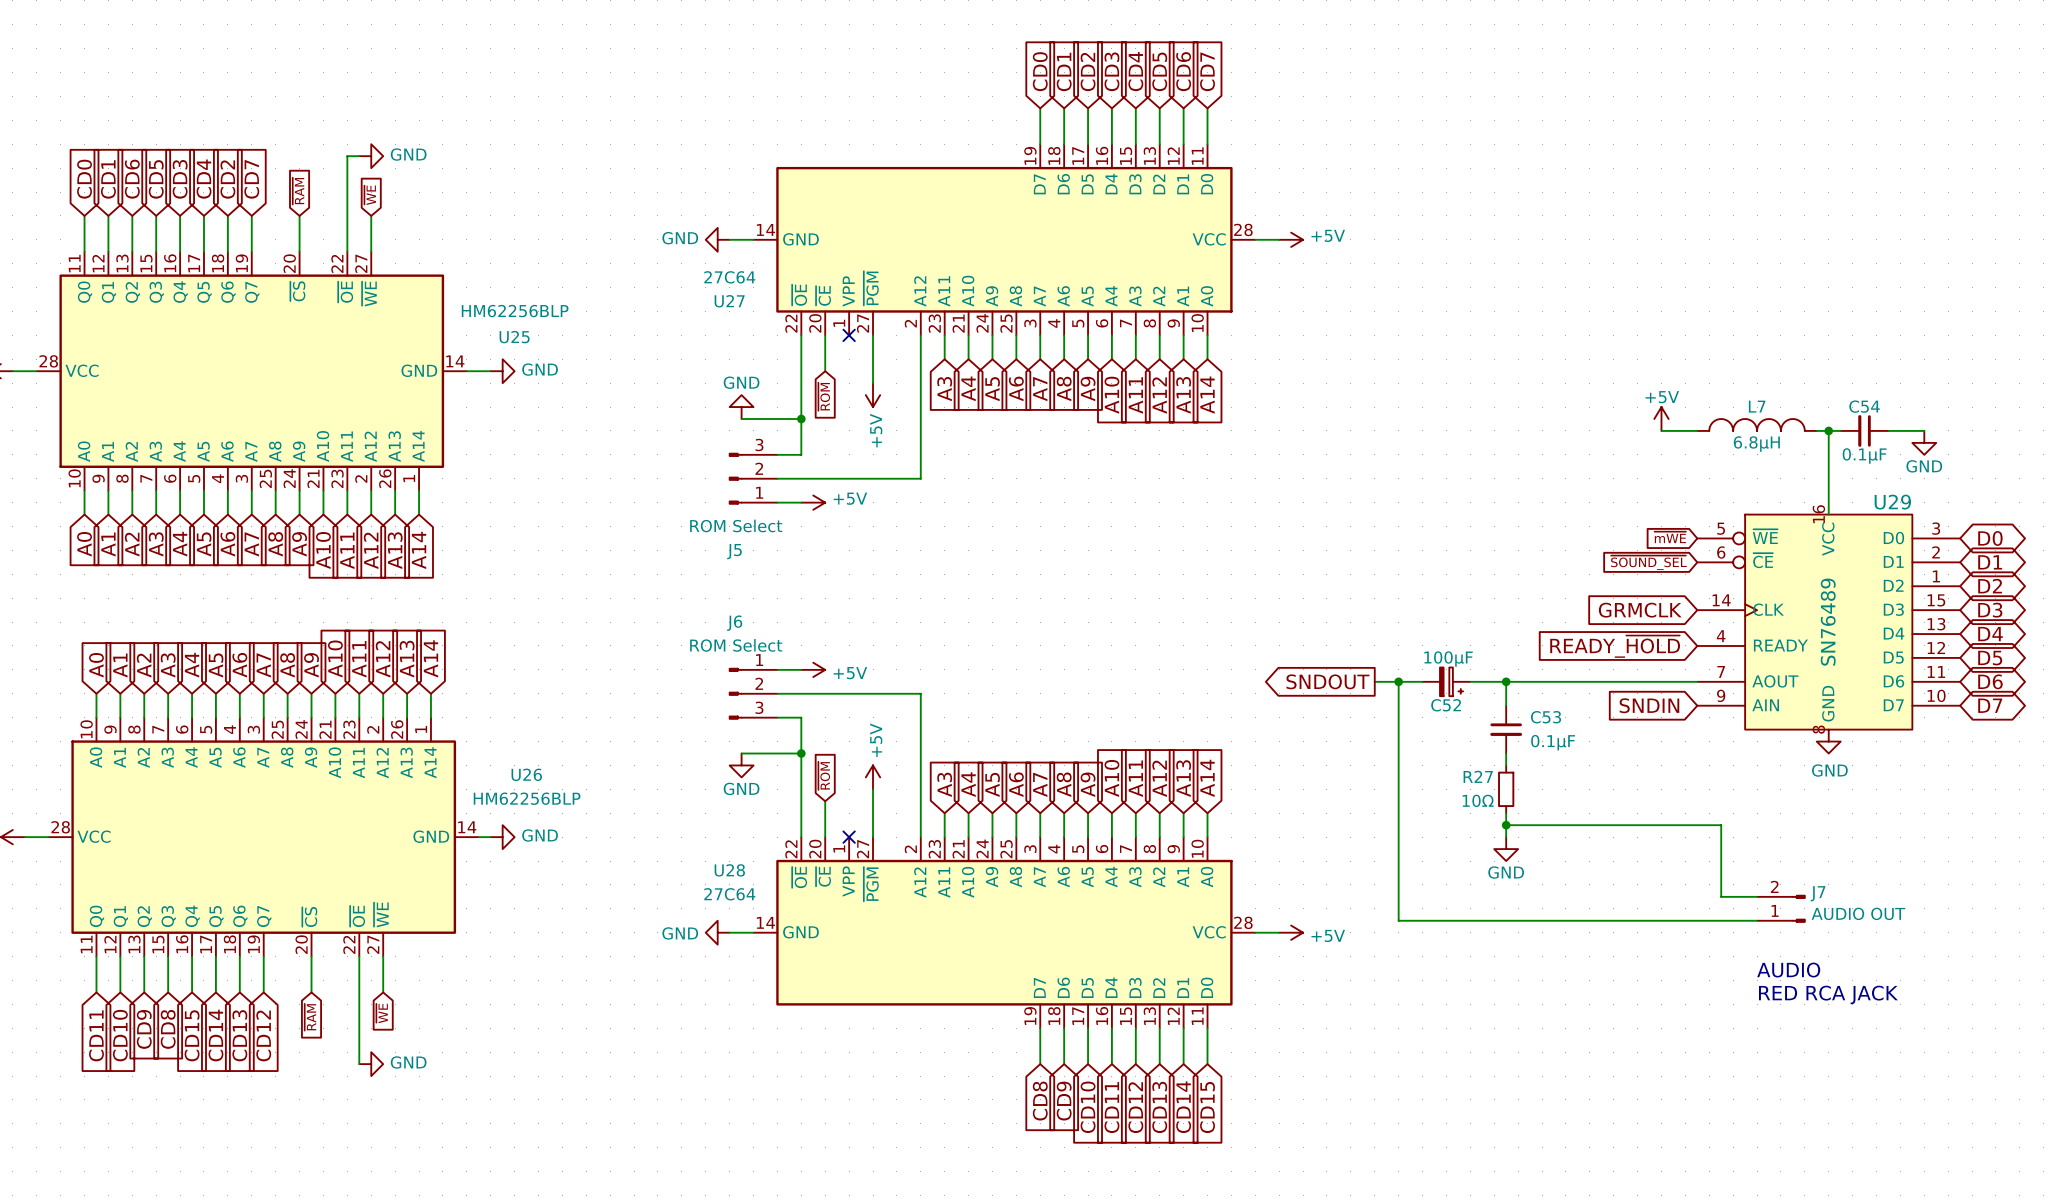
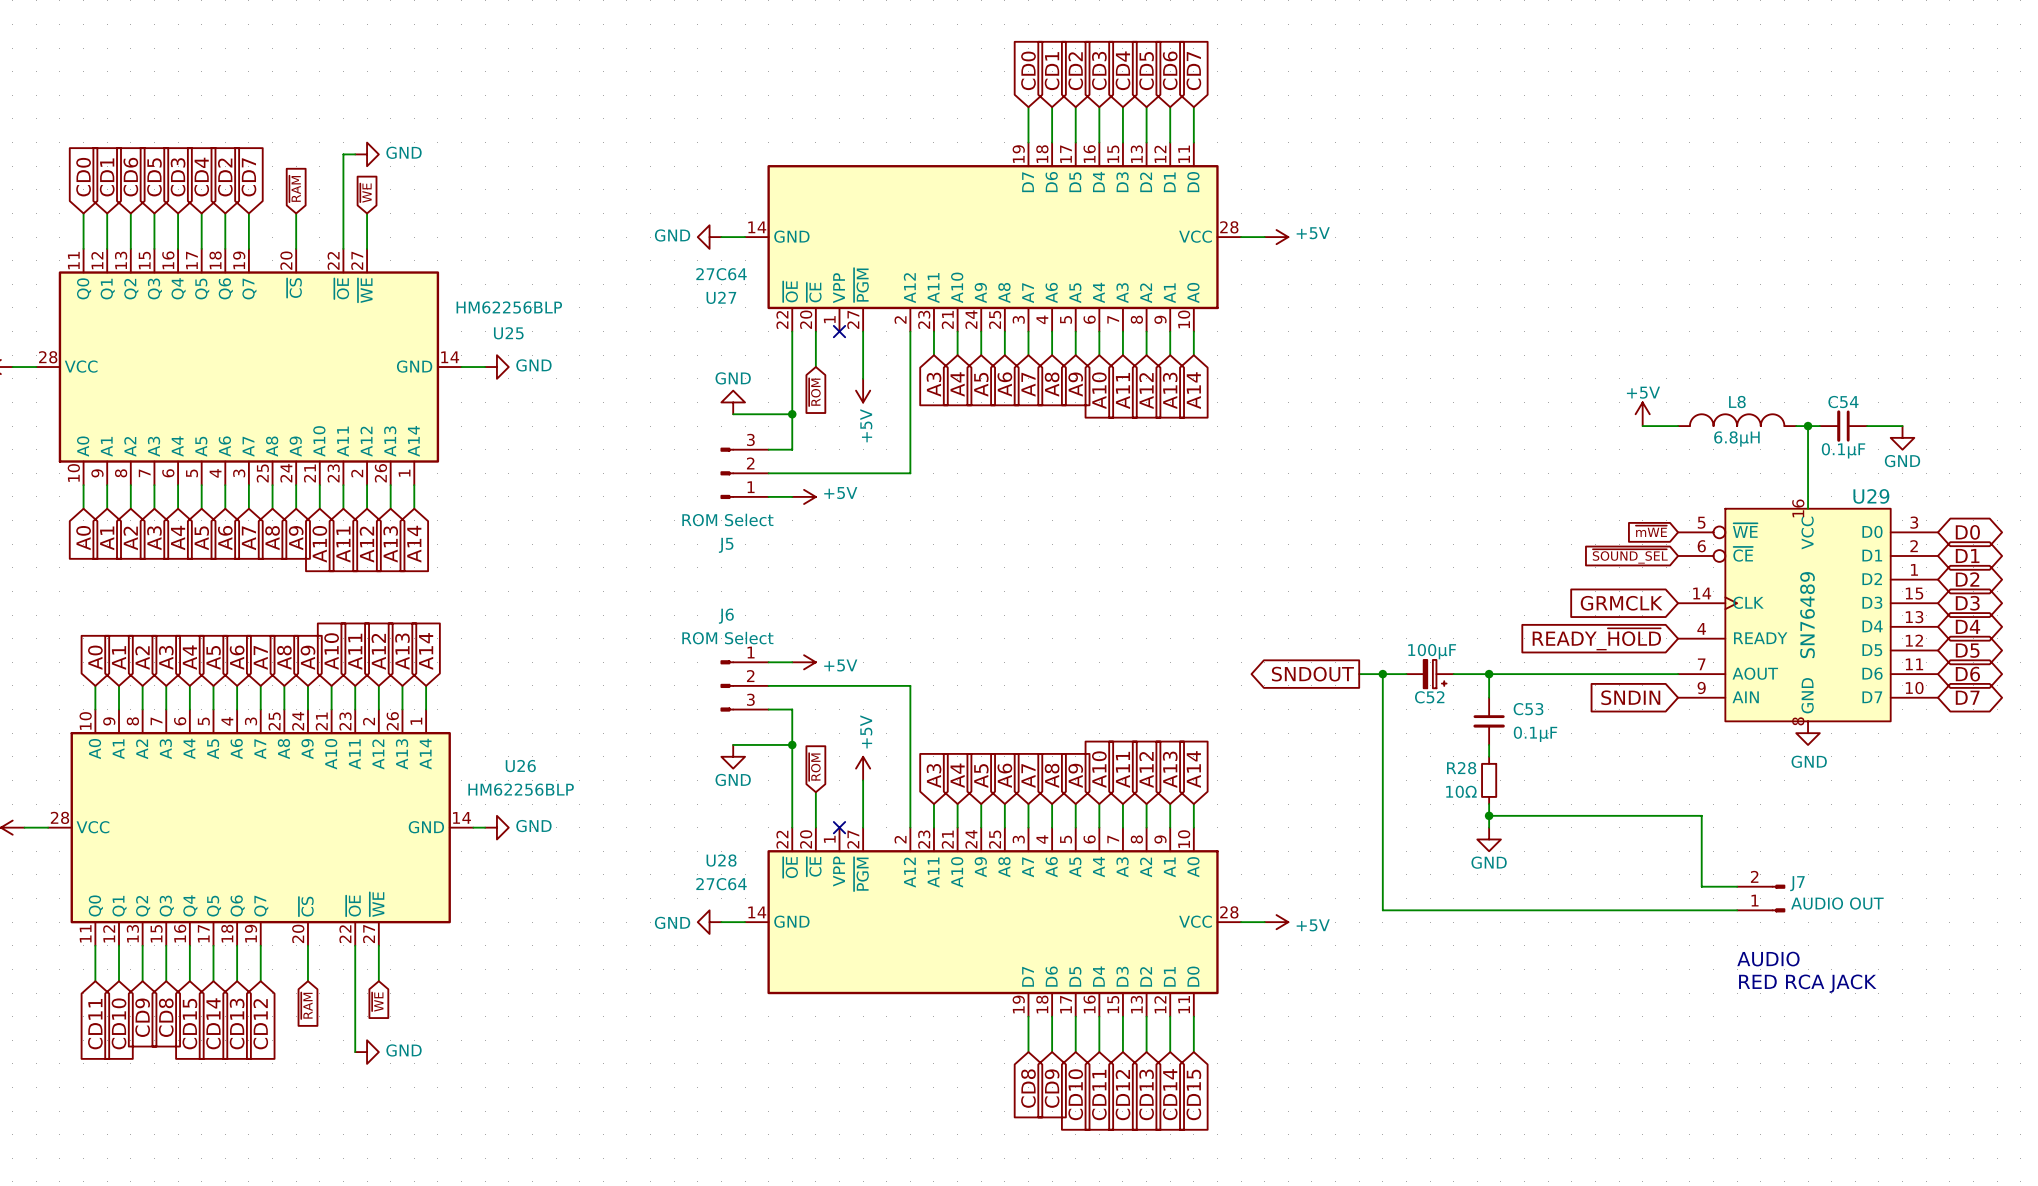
L7 name: L7 (1757, 406) -> L8 (1737, 402)
R27 name: R27 (1478, 776) -> R28 (1461, 768)

